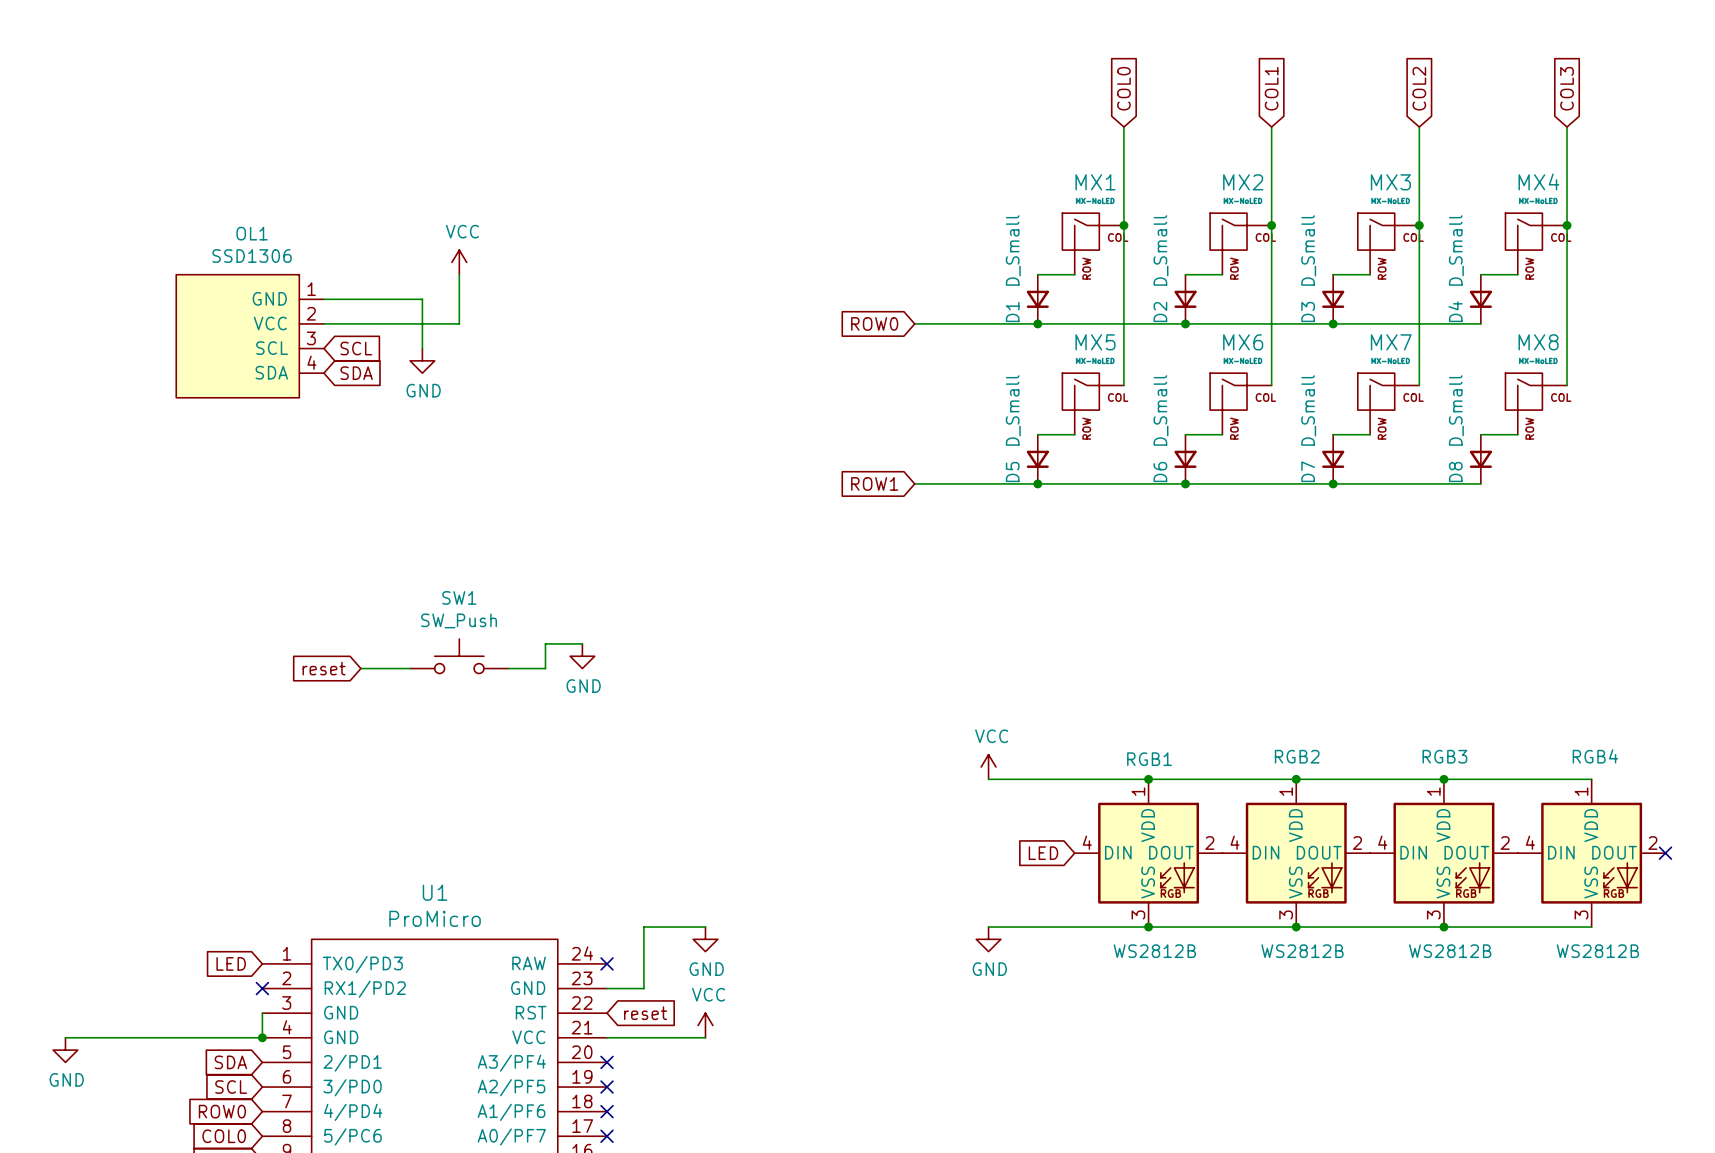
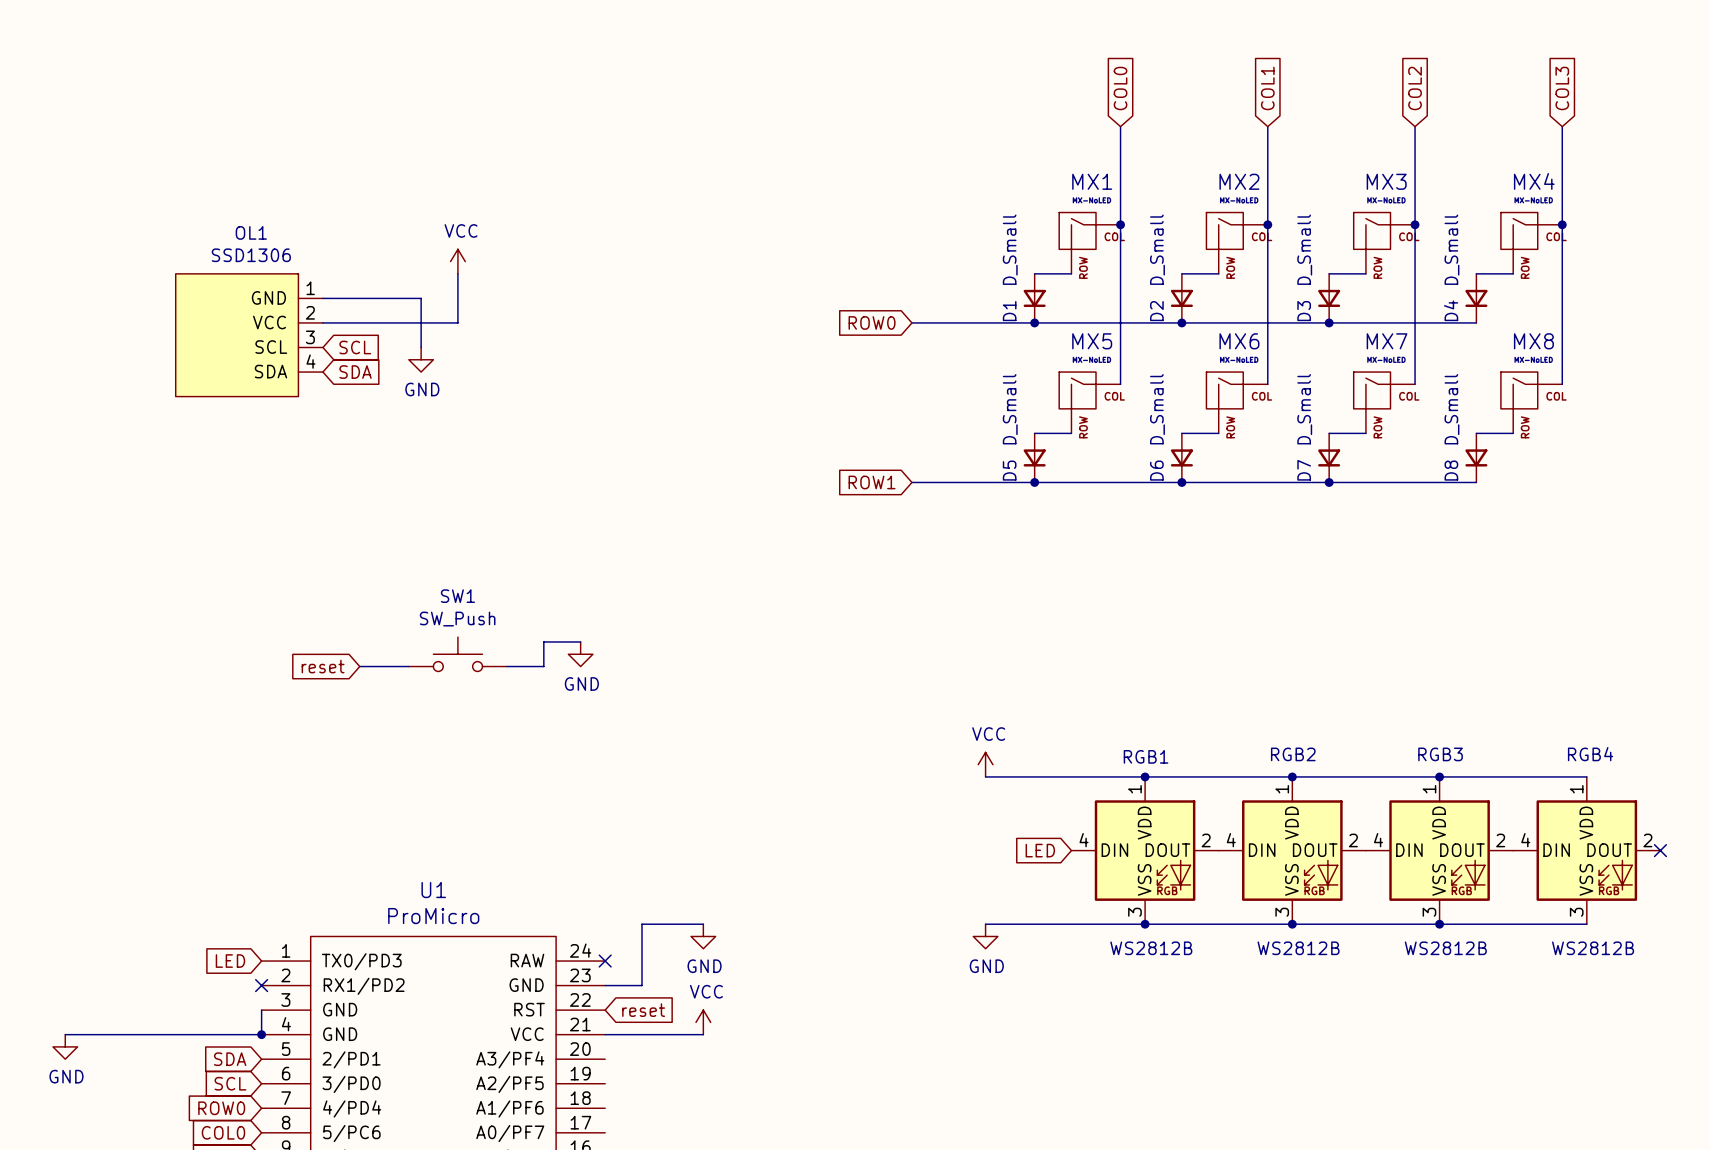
no-connect mark: (607, 1062) -> none
no-connect mark: (607, 1087) -> none
no-connect mark: (607, 1111) -> none
no-connect mark: (607, 1136) -> none

